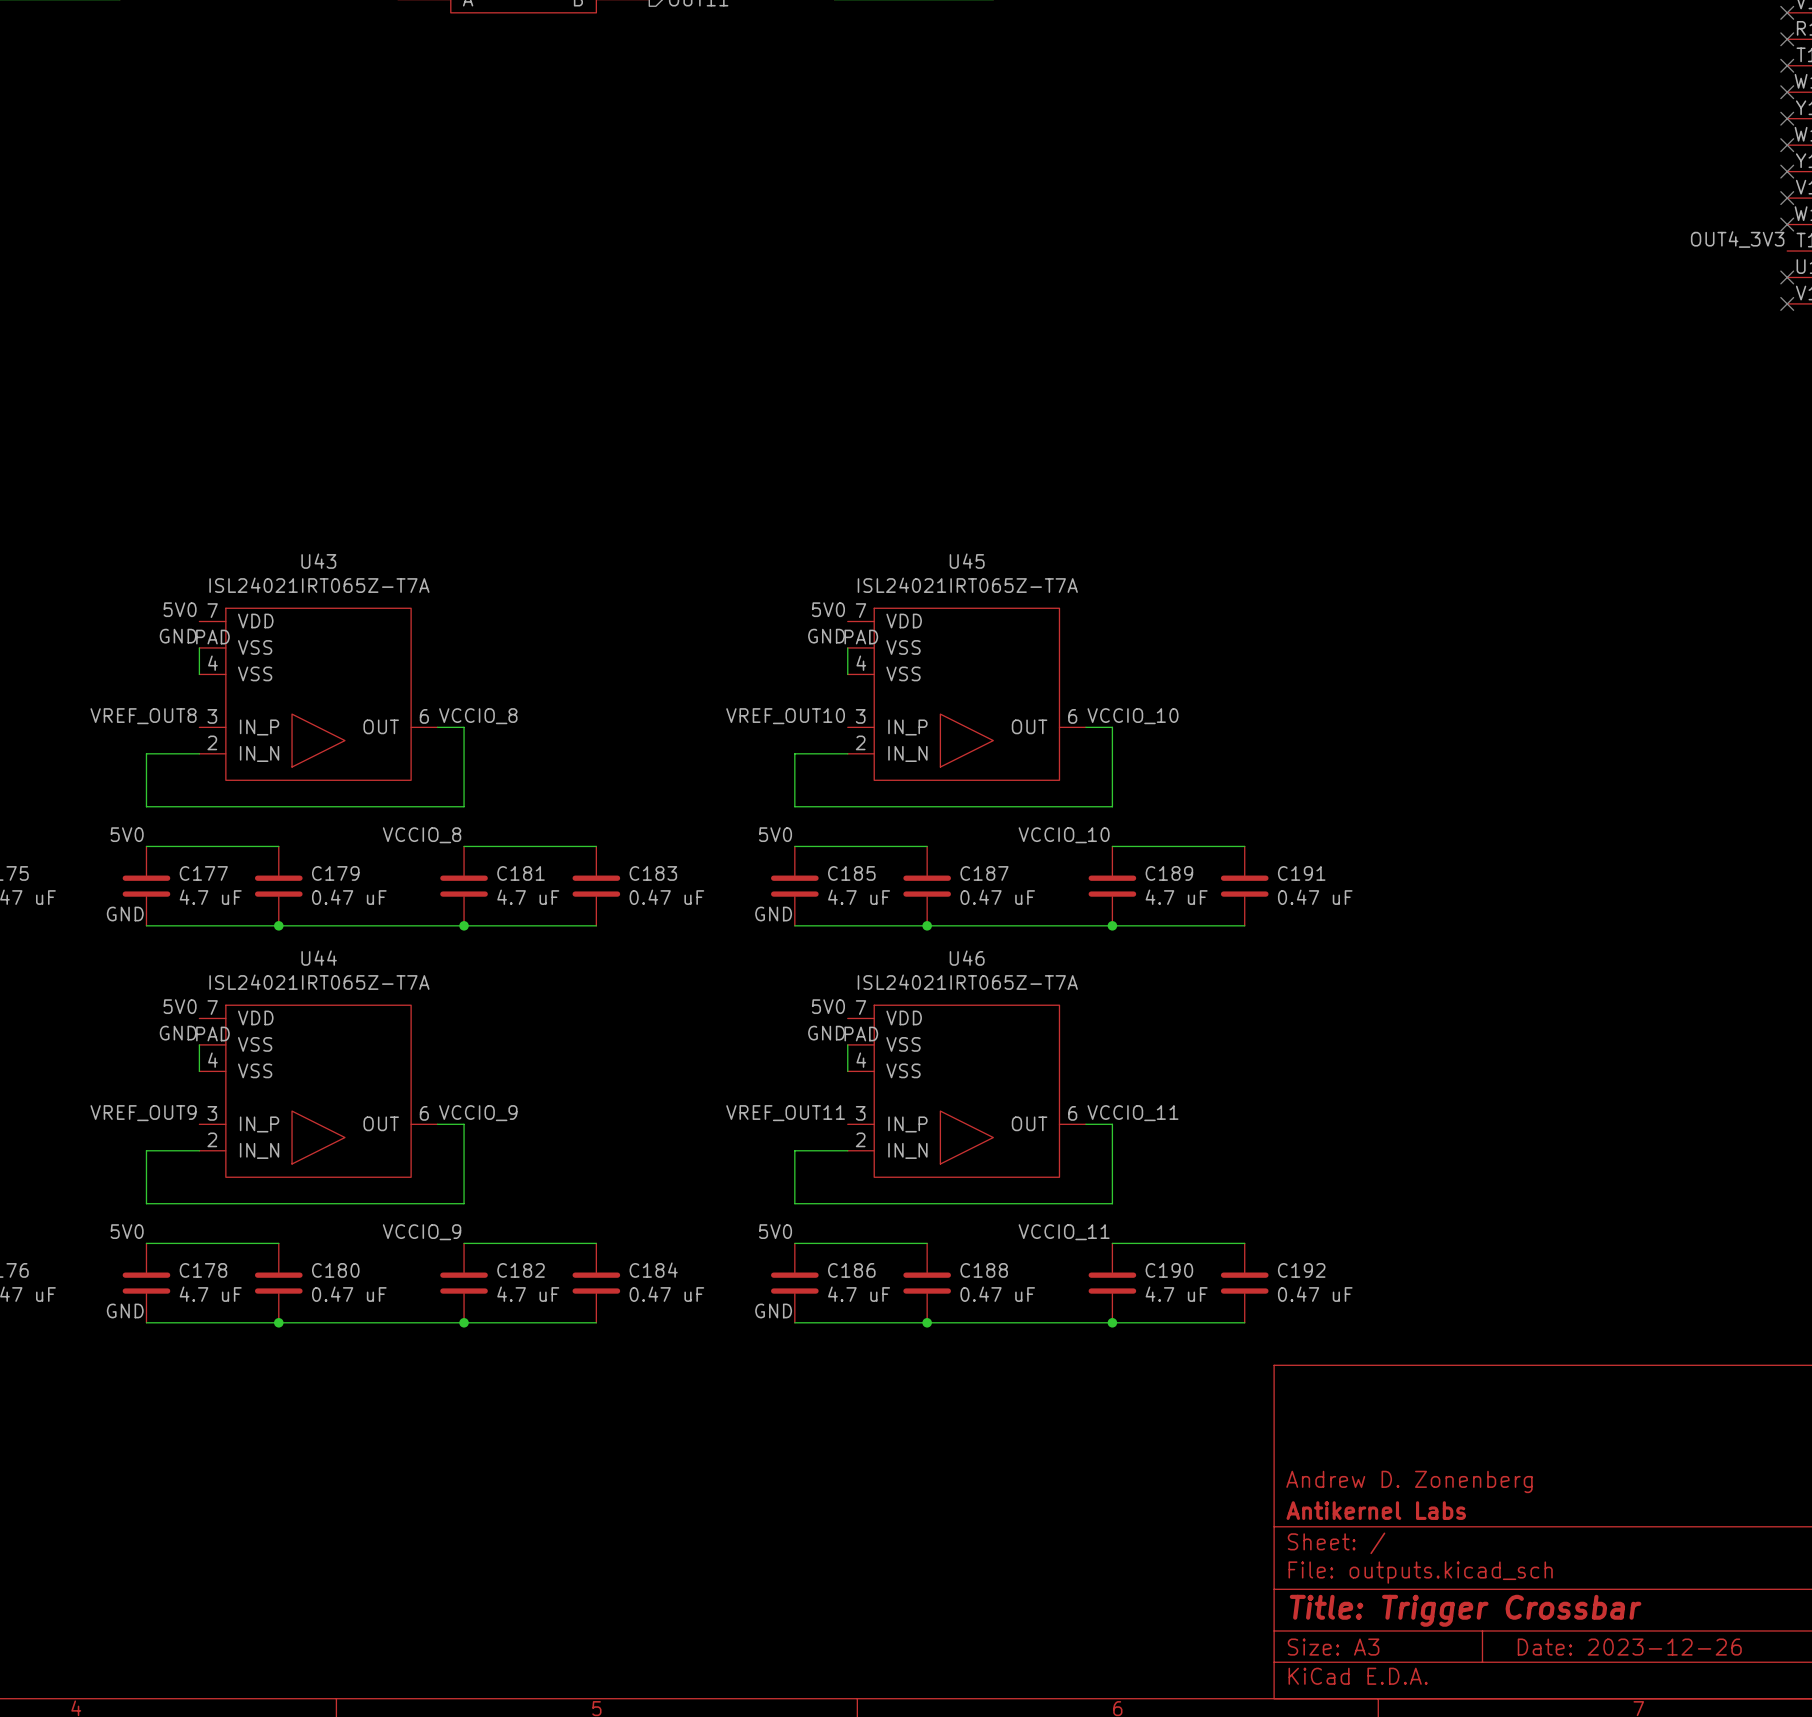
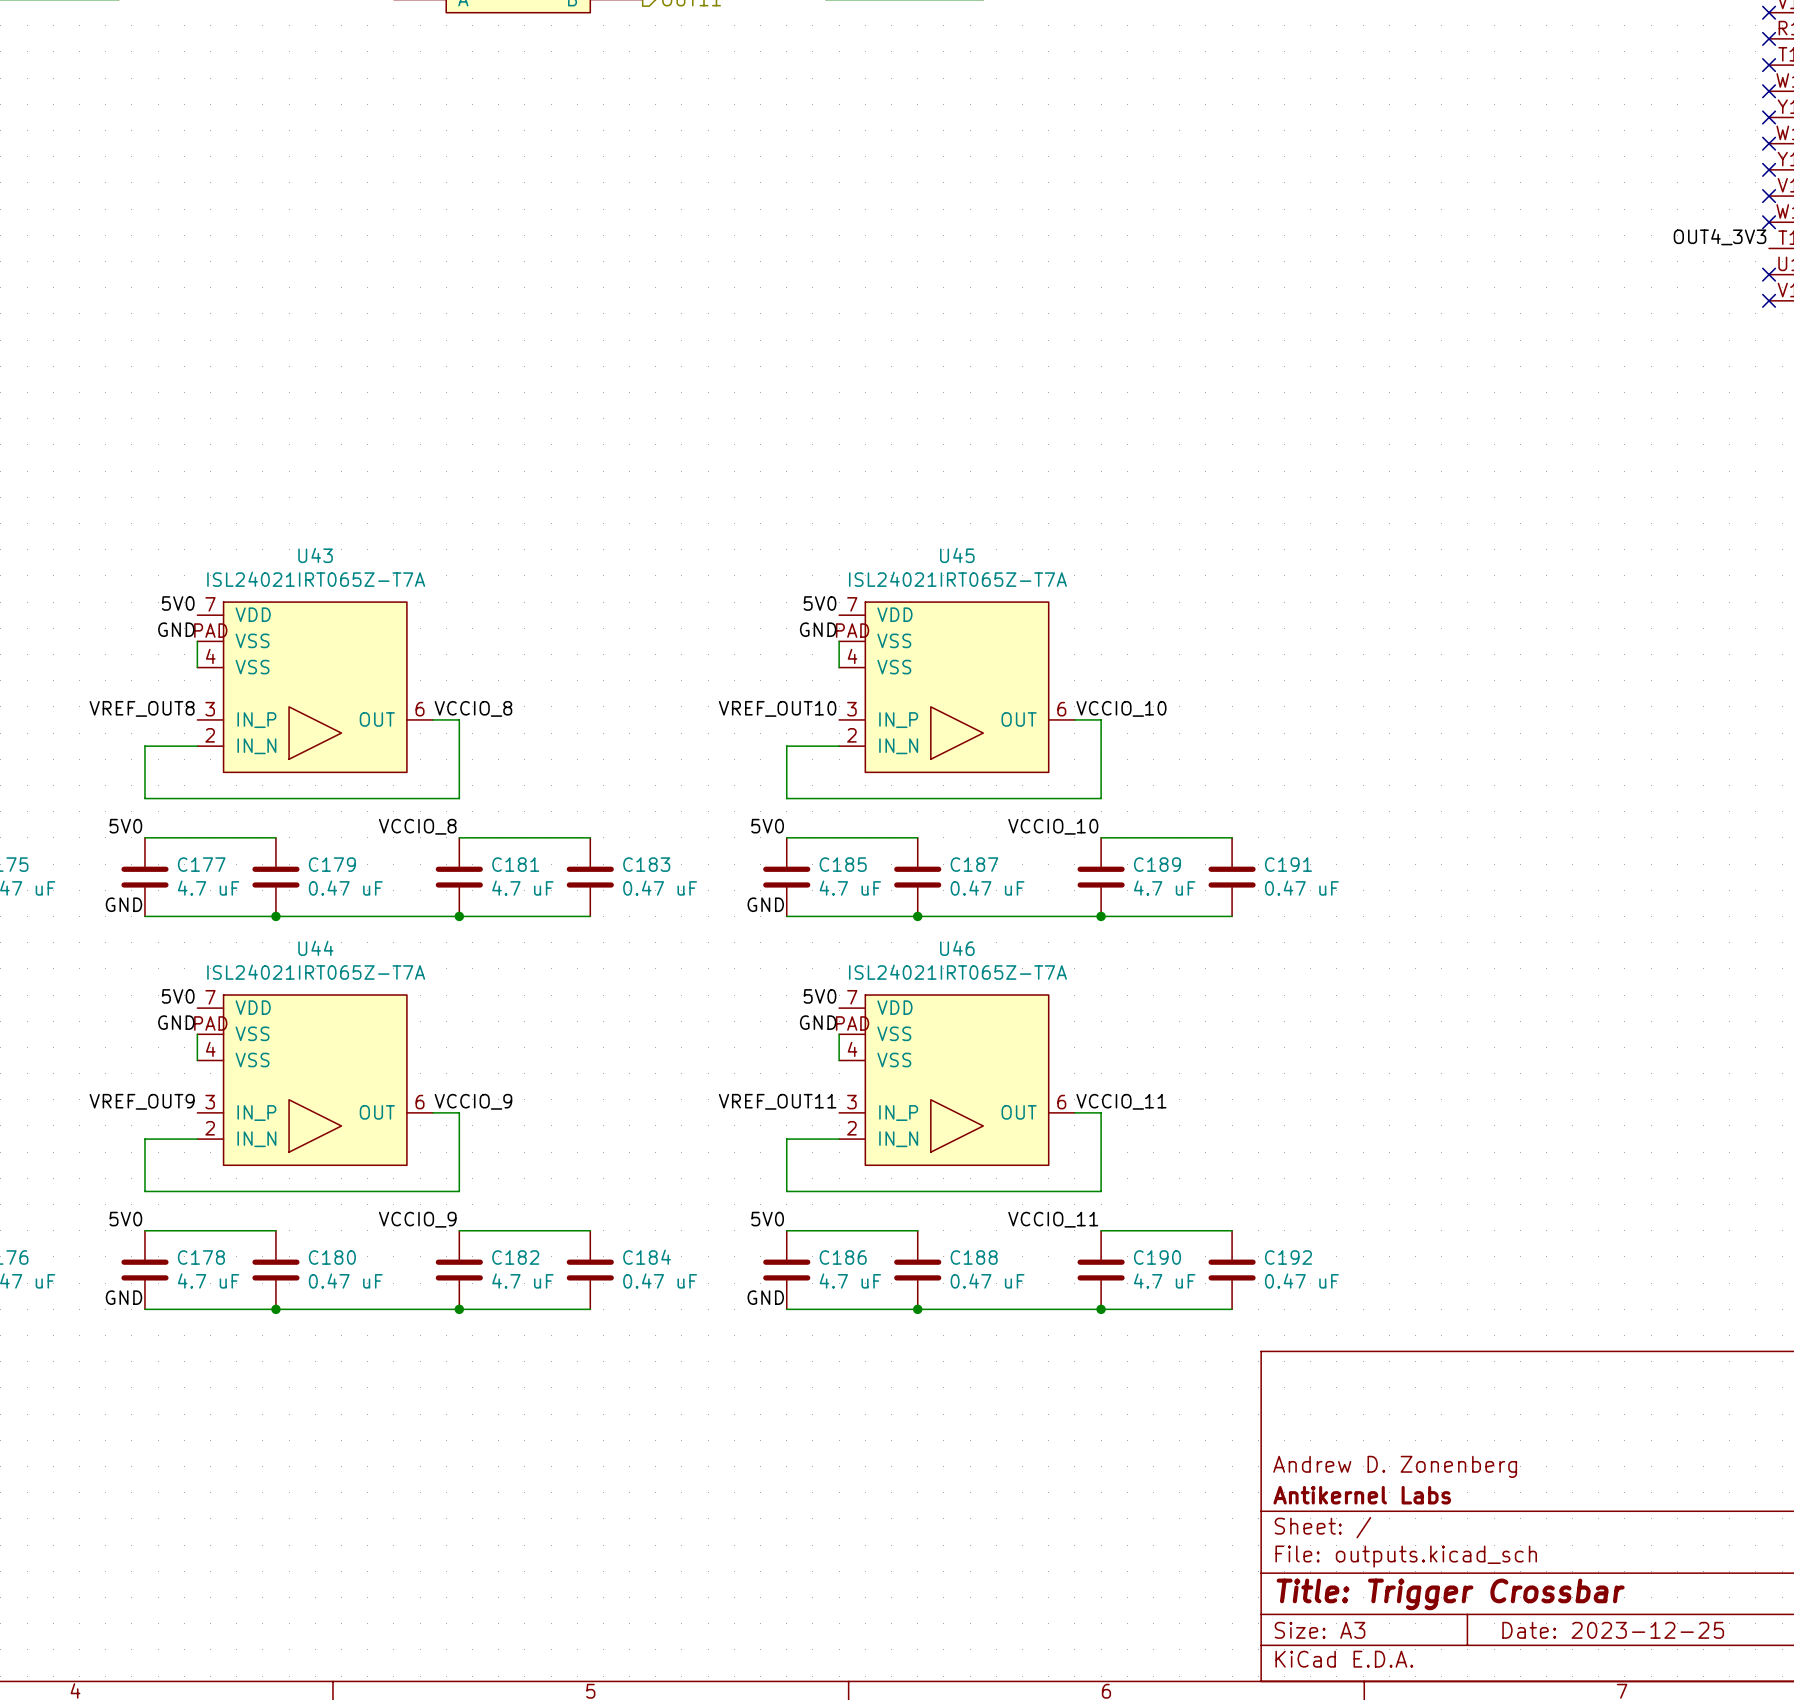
title block: Date: 2023-12-26 (1629, 1647) -> Date: 2023-12-25 (1613, 1630)

